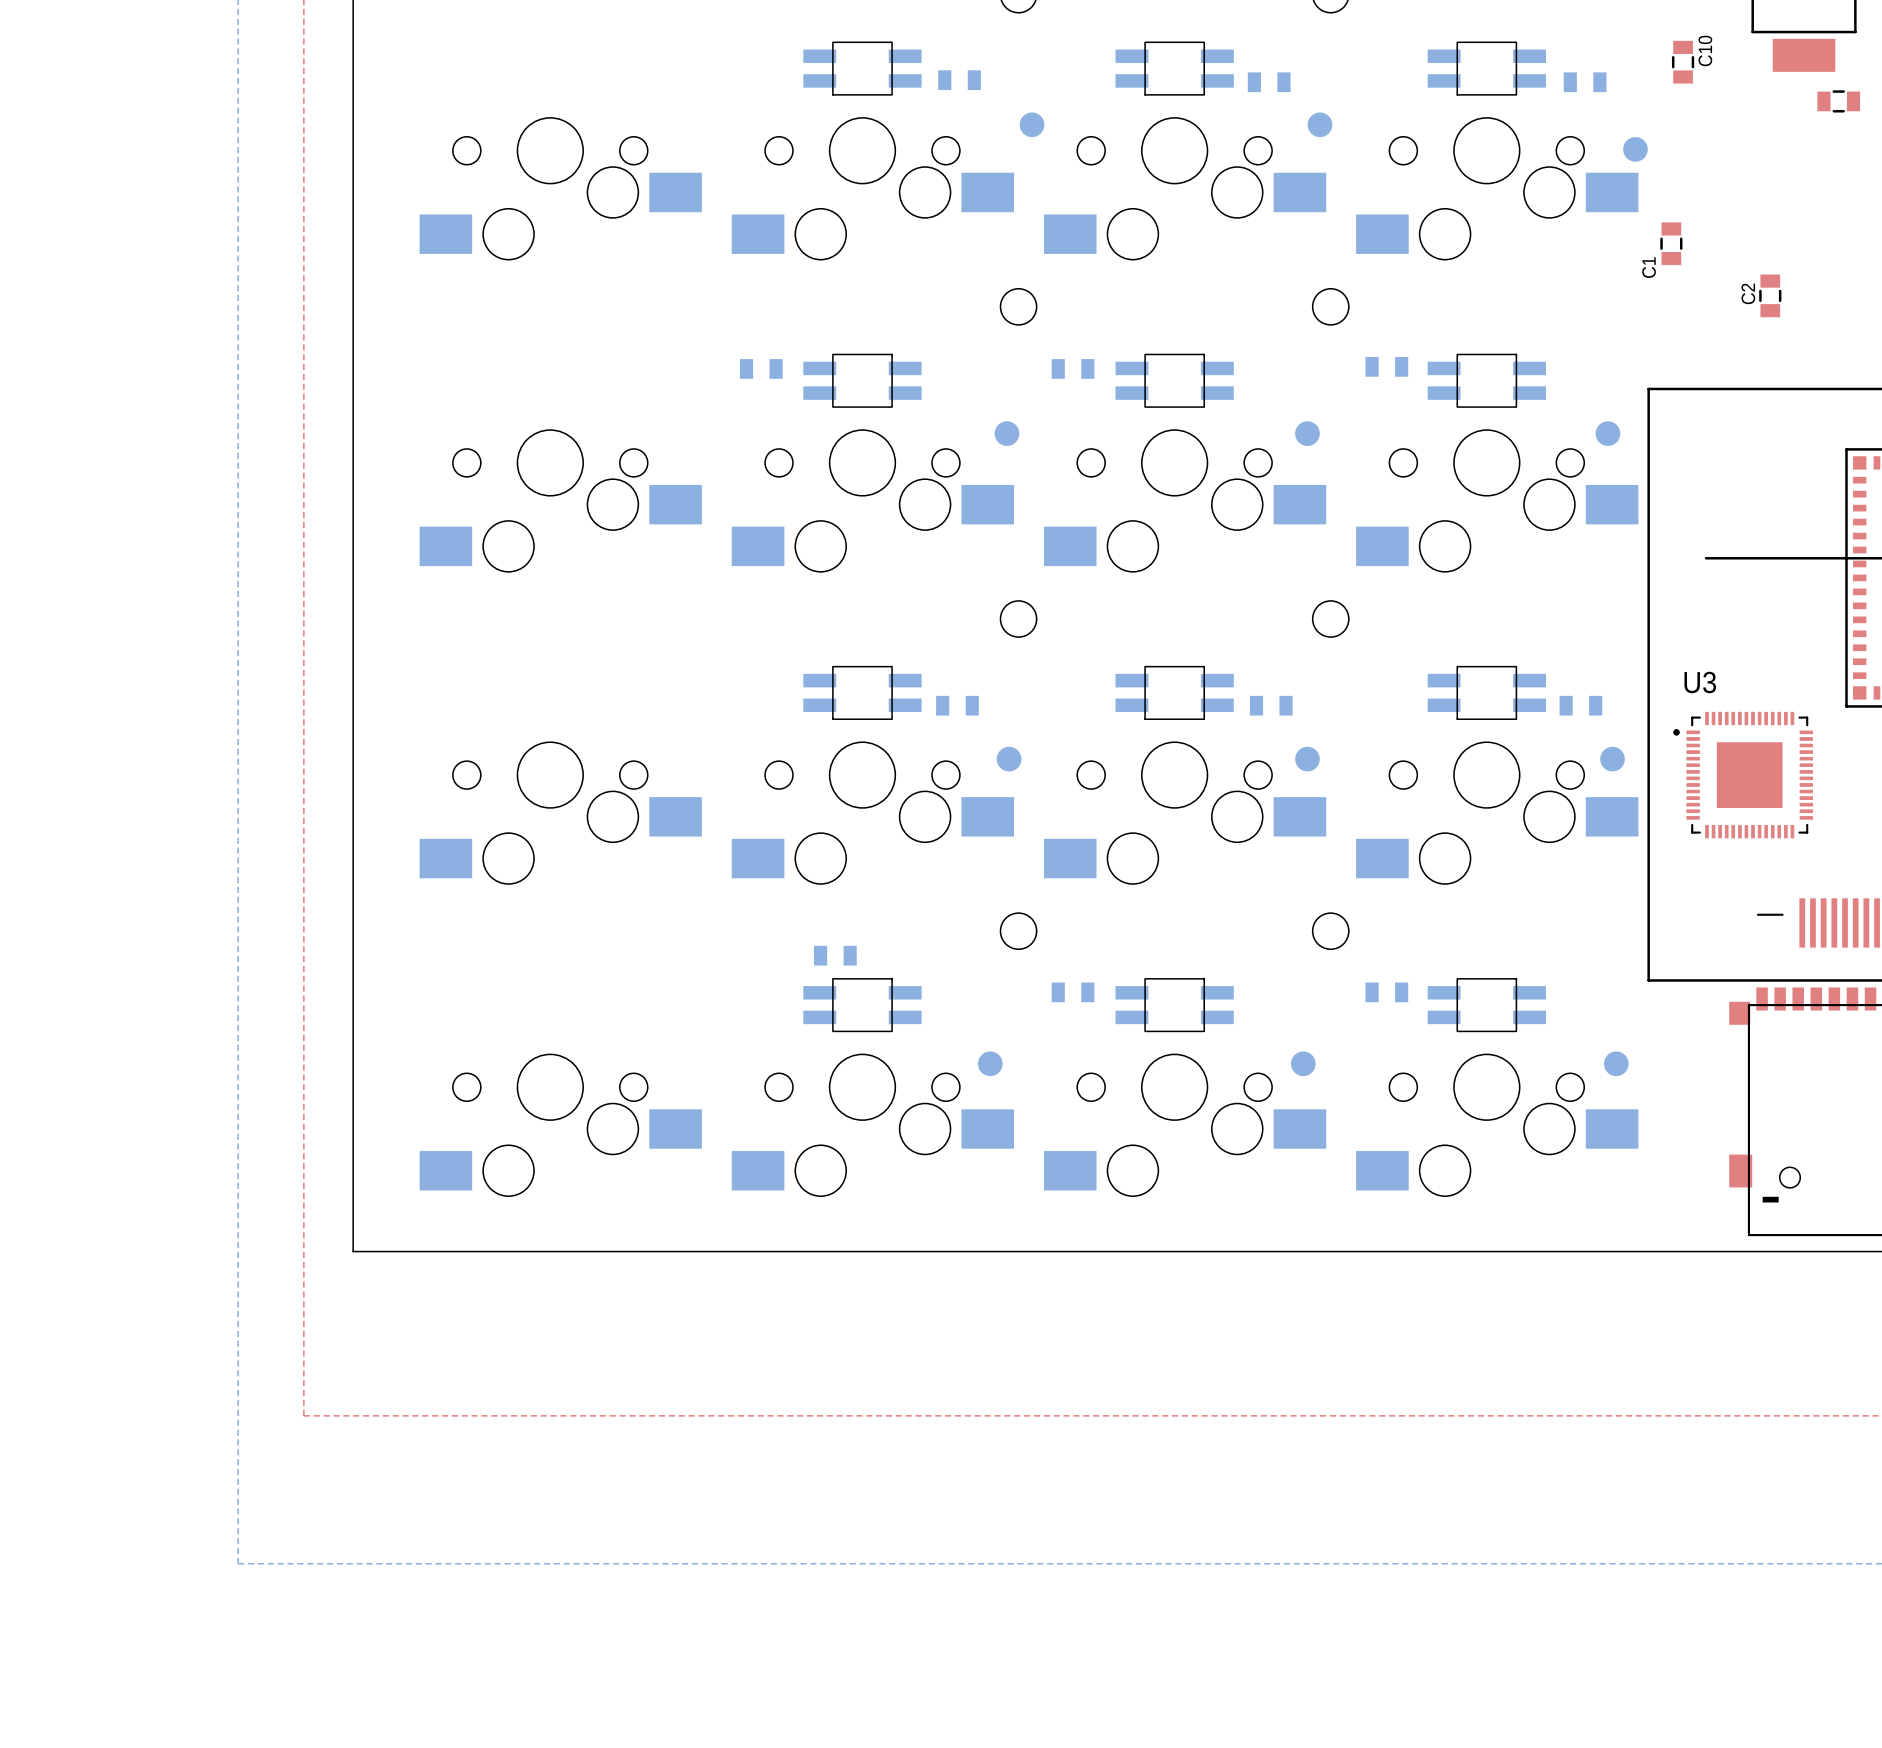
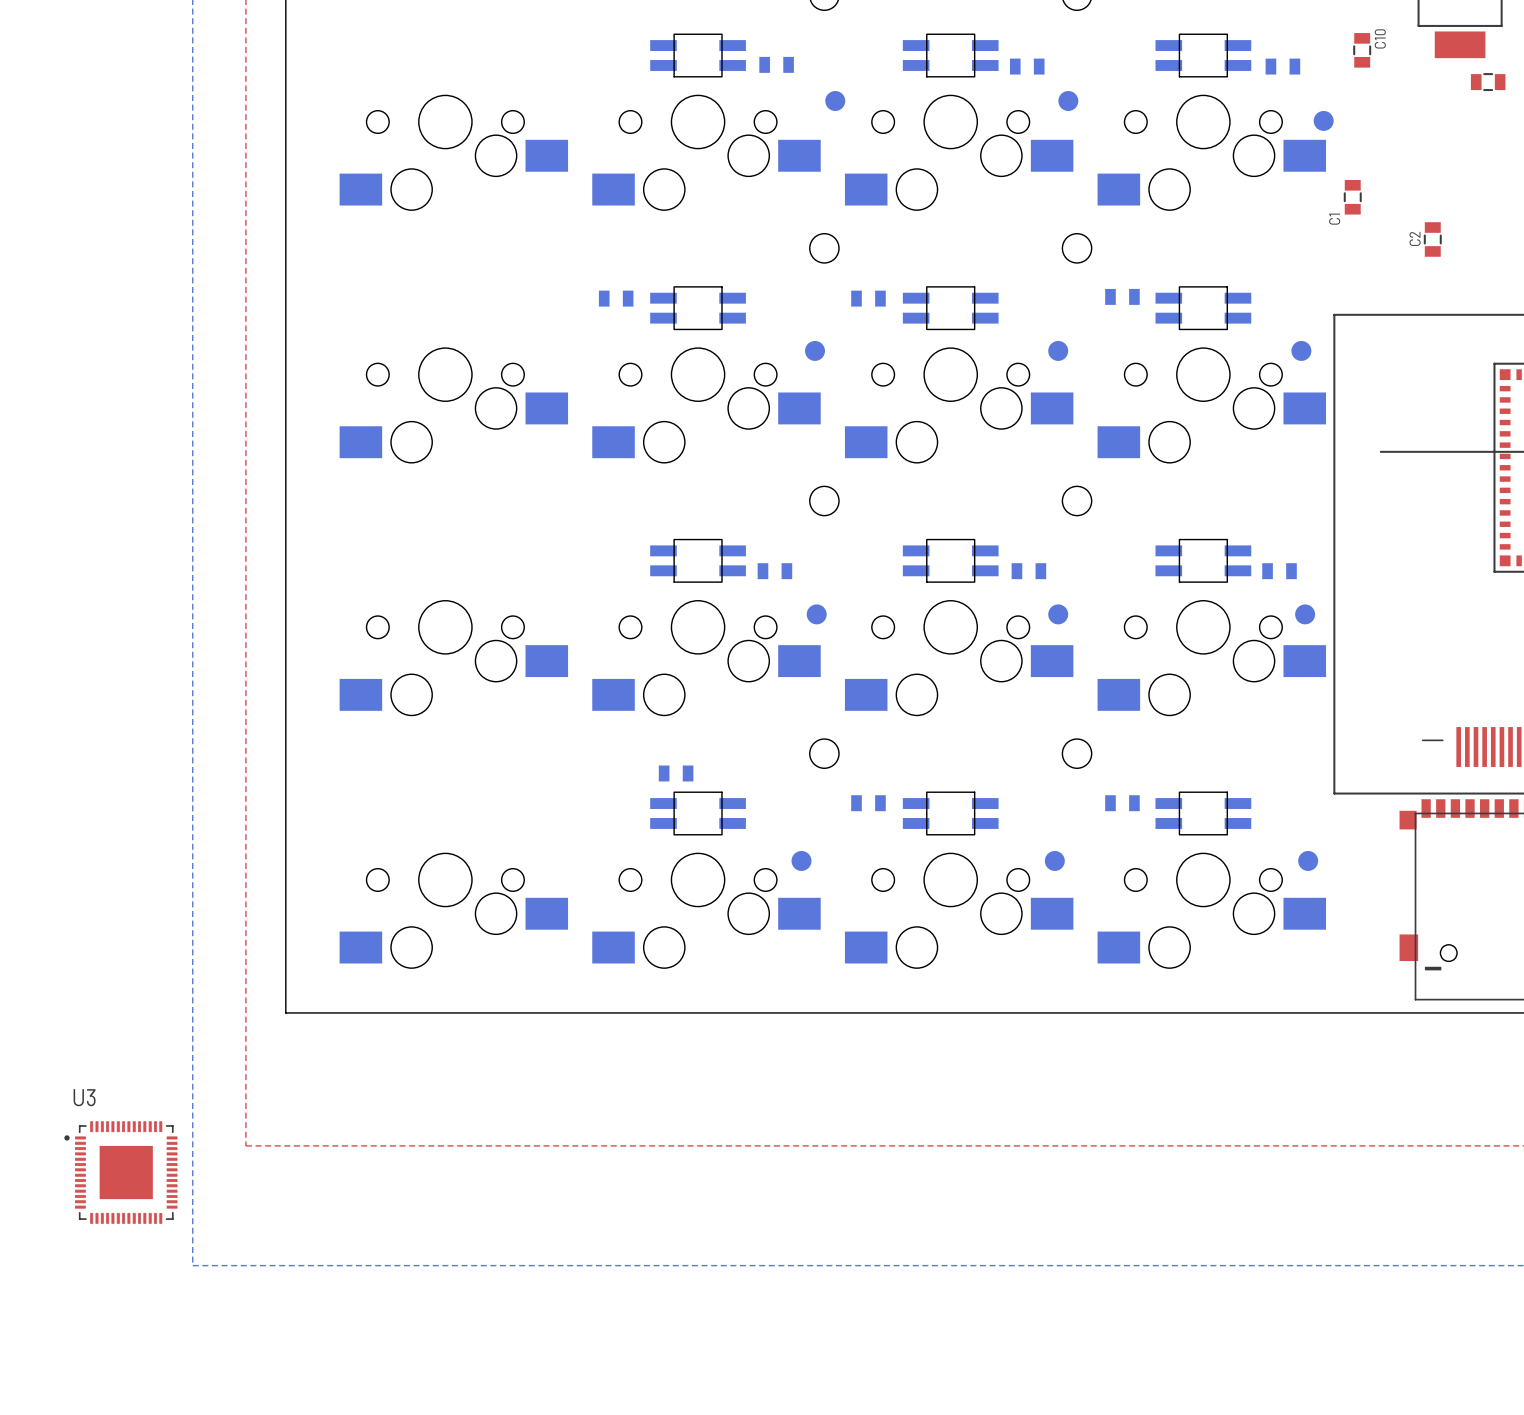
U3 position: (1743, 775) -> (120, 1172)

